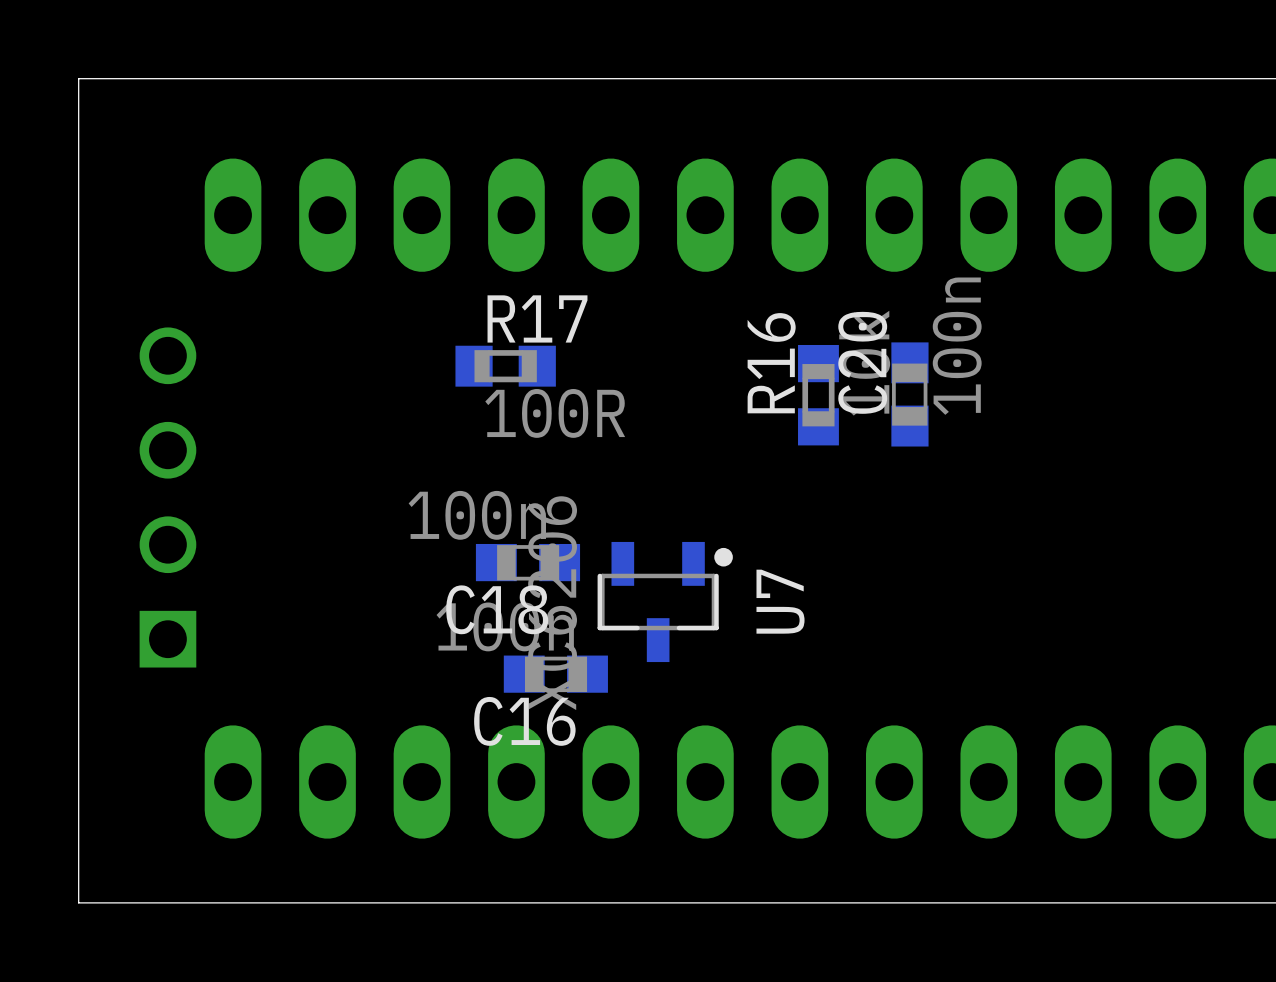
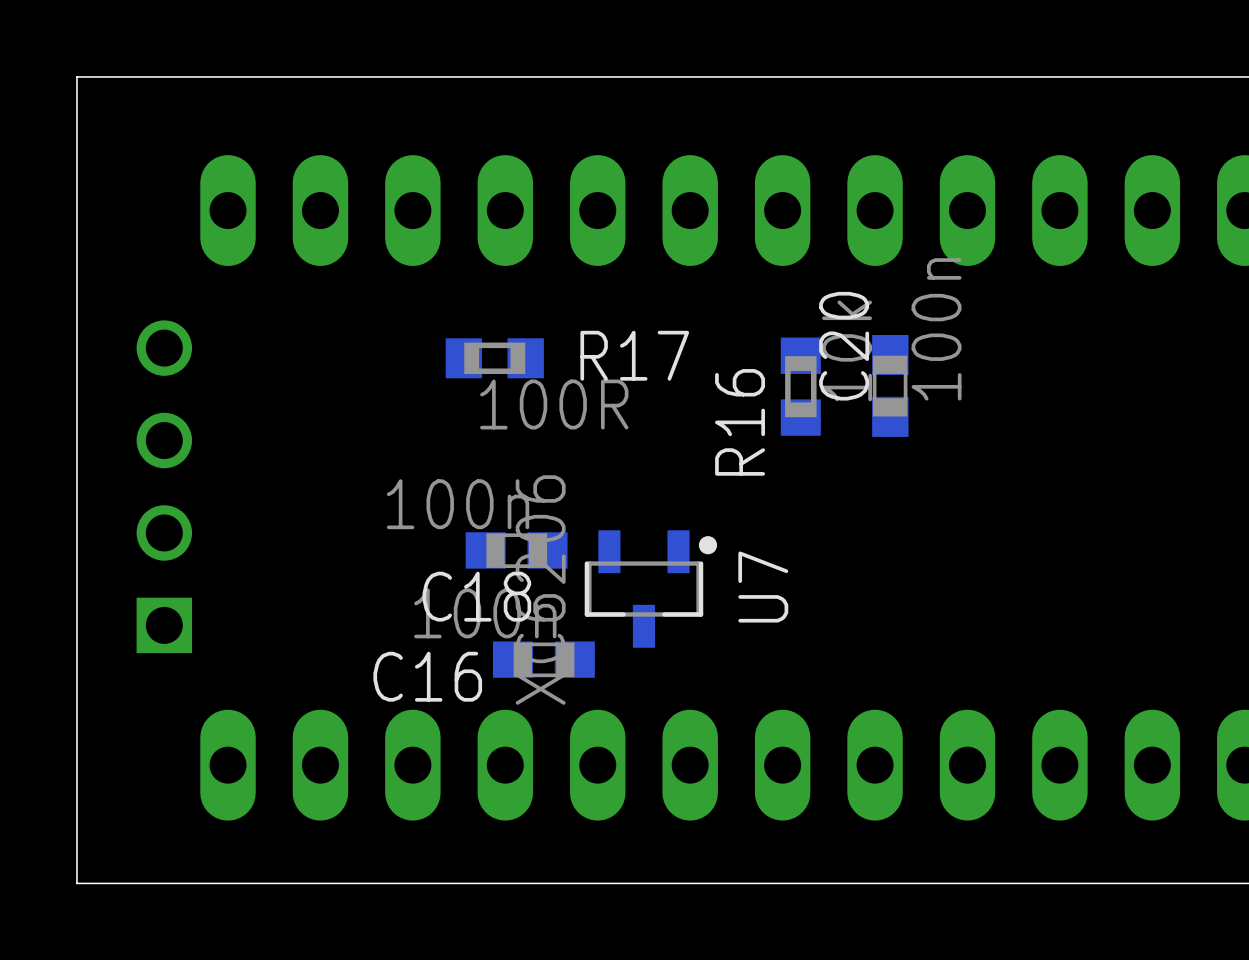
R17 name position: R17 (537, 318) -> R17 (634, 355)
R16 name position: R16 (771, 363) -> R16 (740, 422)
C16 name position: C16 (524, 721) -> C16 (427, 676)

